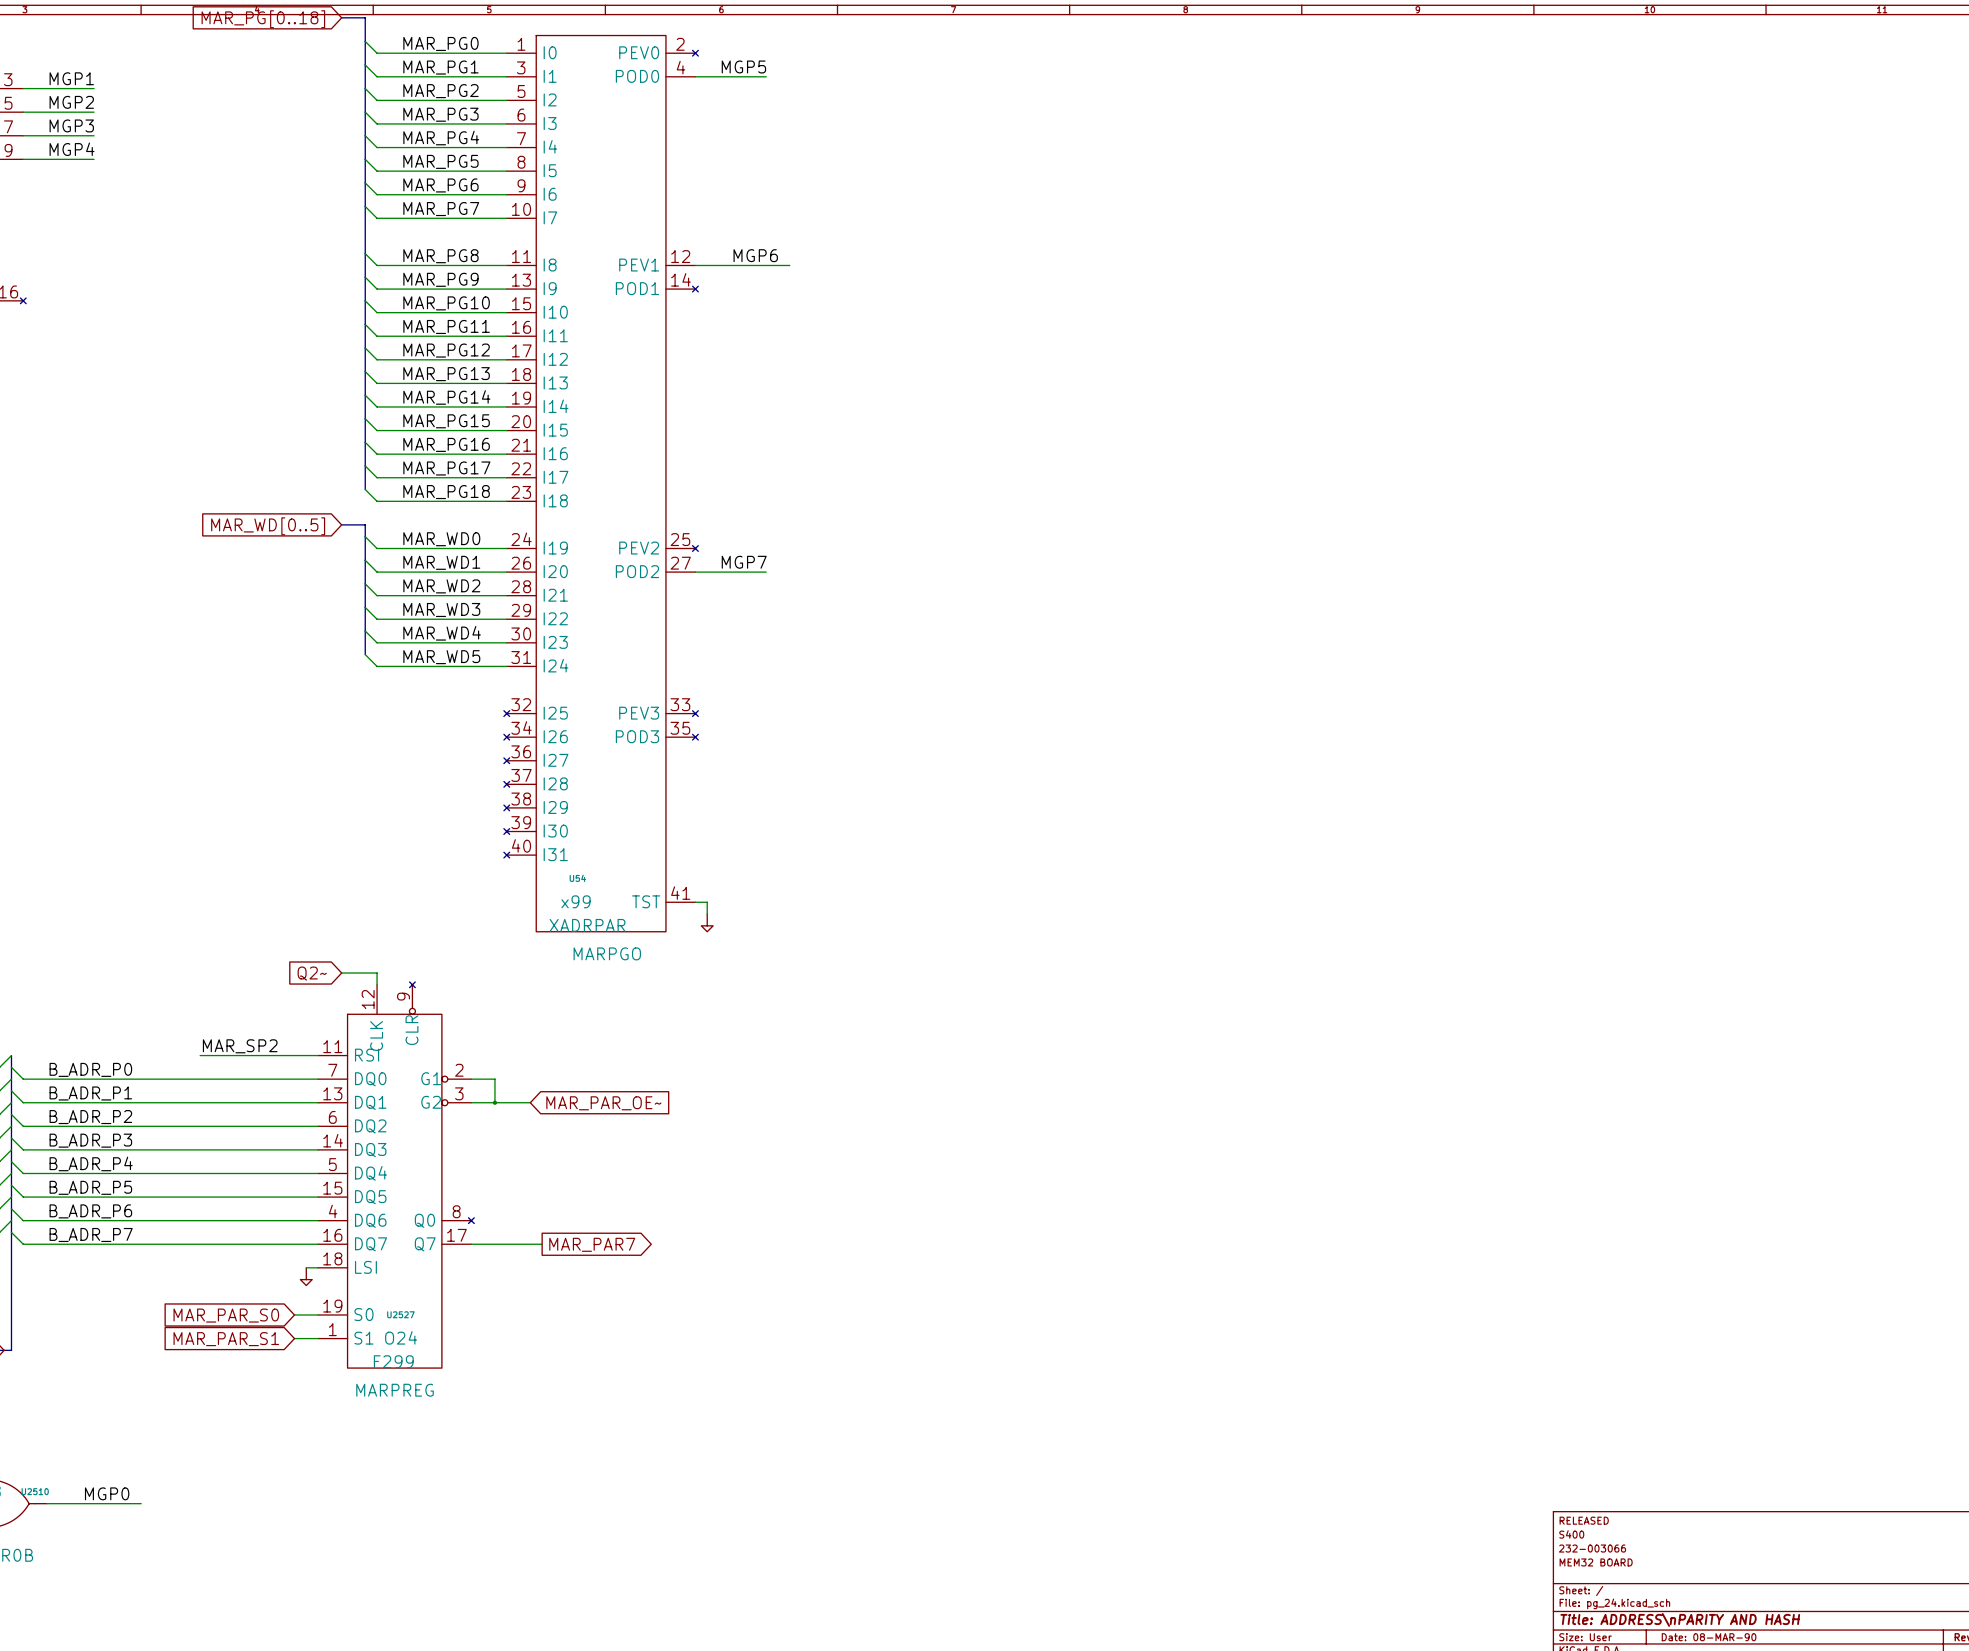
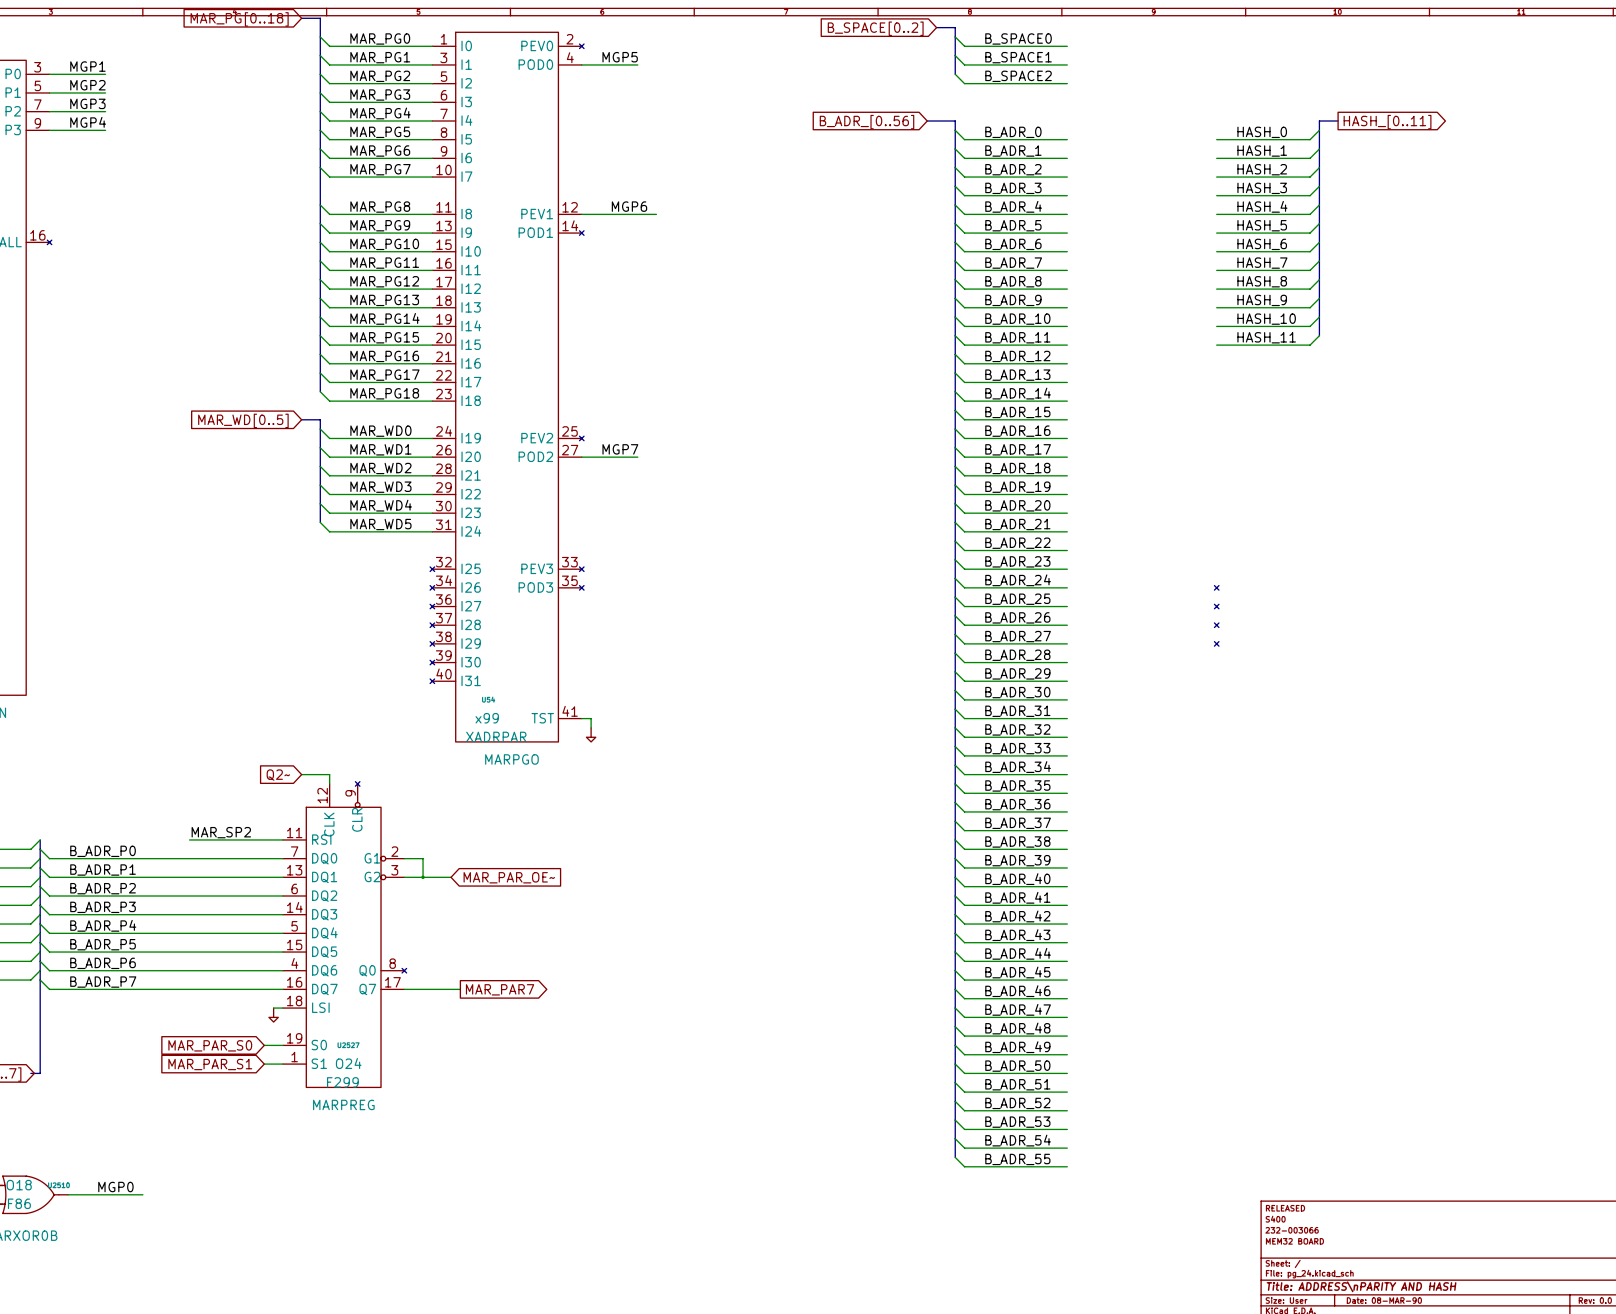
bus: none -> (936, 27) (955, 27) (955, 74)
global label: none -> B_SPACE[0..2] (875, 28)
wire: none -> (955, 36) (964, 46) (1067, 46)
label: none -> B_SPACE0 (1018, 38)
wire: none -> (955, 55) (964, 64) (1067, 64)
label: none -> B_SPACE1 (1018, 57)
wire: none -> (955, 74) (964, 83) (1067, 83)
label: none -> B_SPACE2 (1018, 76)
bus: none -> (927, 121) (955, 121) (955, 1157)
bus: none -> (1338, 121) (1319, 121) (1319, 335)
global label: none -> B_ADR_[0..56] (867, 122)
global label: none -> HASH_[0..11] (1387, 122)
wire: none -> (955, 130) (964, 139) (1067, 139)
wire: none -> (1319, 130) (1310, 139) (1216, 139)
label: none -> B_ADR_0 (1013, 132)
label: none -> HASH_0 (1262, 132)
wire: none -> (955, 149) (964, 158) (1067, 158)
wire: none -> (1319, 149) (1310, 158) (1216, 158)
label: none -> B_ADR_1 (1013, 151)
label: none -> HASH_1 (1262, 151)
wire: none -> (955, 167) (964, 177) (1067, 177)
wire: none -> (1319, 167) (1310, 177) (1216, 177)
label: none -> B_ADR_2 (1013, 169)
label: none -> HASH_2 (1262, 169)
wire: none -> (955, 186) (964, 195) (1067, 195)
wire: none -> (1319, 186) (1310, 195) (1216, 195)
label: none -> B_ADR_3 (1013, 188)
label: none -> HASH_3 (1262, 188)
wire: none -> (955, 205) (964, 214) (1067, 214)
wire: none -> (1319, 205) (1310, 214) (1216, 214)
label: none -> B_ADR_4 (1013, 206)
label: none -> HASH_4 (1262, 206)
wire: none -> (955, 223) (964, 233) (1067, 233)
wire: none -> (1319, 223) (1310, 233) (1216, 233)
label: none -> B_ADR_5 (1013, 225)
label: none -> HASH_5 (1262, 225)
wire: none -> (955, 242) (964, 251) (1067, 251)
wire: none -> (1319, 242) (1310, 251) (1216, 251)
label: none -> B_ADR_6 (1013, 244)
label: none -> HASH_6 (1262, 244)
wire: none -> (955, 261) (964, 270) (1067, 270)
wire: none -> (1319, 261) (1310, 270) (1216, 270)
label: none -> B_ADR_7 (1013, 263)
label: none -> HASH_7 (1262, 263)
wire: none -> (955, 279) (964, 289) (1067, 289)
wire: none -> (1319, 279) (1310, 289) (1216, 289)
label: none -> B_ADR_8 (1013, 281)
label: none -> HASH_8 (1262, 281)
wire: none -> (955, 298) (964, 307) (1067, 307)
wire: none -> (1319, 298) (1310, 307) (1216, 307)
label: none -> B_ADR_9 (1013, 300)
label: none -> HASH_9 (1262, 300)
wire: none -> (955, 317) (964, 326) (1067, 326)
wire: none -> (1319, 317) (1310, 326) (1216, 326)
label: none -> B_ADR_10 (1017, 319)
label: none -> HASH_10 (1266, 319)
wire: none -> (955, 335) (964, 345) (1067, 345)
wire: none -> (1319, 335) (1310, 345) (1216, 345)
label: none -> B_ADR_11 (1017, 337)
label: none -> HASH_11 (1266, 337)
wire: none -> (955, 354) (964, 363) (1067, 363)
label: none -> B_ADR_12 (1017, 356)
wire: none -> (955, 373) (964, 382) (1067, 382)
label: none -> B_ADR_13 (1017, 375)
wire: none -> (955, 391) (964, 401) (1067, 401)
label: none -> B_ADR_14 (1018, 393)
wire: none -> (955, 410) (964, 419) (1067, 419)
label: none -> B_ADR_15 (1017, 412)
wire: none -> (955, 429) (964, 438) (1067, 438)
label: none -> B_ADR_16 (1017, 431)
wire: none -> (955, 447) (964, 457) (1067, 457)
label: none -> B_ADR_17 (1018, 449)
wire: none -> (955, 466) (964, 475) (1067, 475)
label: none -> B_ADR_18 (1017, 468)
wire: none -> (955, 485) (964, 494) (1067, 494)
label: none -> B_ADR_19 (1017, 487)
wire: none -> (955, 503) (964, 513) (1067, 513)
label: none -> B_ADR_20 (1017, 505)
wire: none -> (955, 522) (964, 531) (1067, 531)
label: none -> B_ADR_21 (1017, 524)
wire: none -> (955, 541) (964, 550) (1067, 550)
label: none -> B_ADR_22 (1017, 543)
wire: none -> (955, 559) (964, 569) (1067, 569)
label: none -> B_ADR_23 (1017, 561)
wire: none -> (955, 578) (964, 587) (1067, 587)
label: none -> B_ADR_24 (1018, 580)
no-connect mark: none -> (1216, 587)
wire: none -> (955, 597) (964, 606) (1067, 606)
label: none -> B_ADR_25 (1017, 599)
no-connect mark: none -> (1216, 606)
wire: none -> (955, 615) (964, 625) (1067, 625)
label: none -> B_ADR_26 (1017, 617)
no-connect mark: none -> (1216, 625)
wire: none -> (955, 634) (964, 643) (1067, 643)
label: none -> B_ADR_27 (1018, 636)
no-connect mark: none -> (1216, 643)
wire: none -> (955, 653) (964, 662) (1067, 662)
label: none -> B_ADR_28 (1017, 655)
wire: none -> (955, 671) (964, 681) (1067, 681)
label: none -> B_ADR_29 (1017, 673)
wire: none -> (955, 690) (964, 699) (1067, 699)
label: none -> B_ADR_30 (1017, 692)
wire: none -> (955, 709) (964, 718) (1067, 718)
label: none -> B_ADR_31 (1017, 711)
wire: none -> (955, 727) (964, 737) (1067, 737)
label: none -> B_ADR_32 (1017, 729)
wire: none -> (955, 746) (964, 755) (1067, 755)
label: none -> B_ADR_33 (1017, 748)
wire: none -> (955, 765) (964, 774) (1067, 774)
label: none -> B_ADR_34 (1018, 767)
wire: none -> (955, 783) (964, 793) (1067, 793)
label: none -> B_ADR_35 (1017, 785)
wire: none -> (955, 802) (964, 811) (1067, 811)
label: none -> B_ADR_36 (1017, 804)
wire: none -> (955, 821) (964, 830) (1067, 830)
label: none -> B_ADR_37 (1018, 823)
wire: none -> (955, 839) (964, 849) (1067, 849)
label: none -> B_ADR_38 (1017, 841)
wire: none -> (955, 858) (964, 867) (1067, 867)
label: none -> B_ADR_39 (1017, 860)
wire: none -> (955, 877) (964, 886) (1067, 886)
label: none -> B_ADR_40 (1017, 879)
wire: none -> (955, 896) (964, 905) (1067, 905)
label: none -> B_ADR_41 (1017, 897)
wire: none -> (955, 914) (964, 924) (1067, 924)
label: none -> B_ADR_42 (1017, 916)
wire: none -> (955, 933) (964, 942) (1067, 942)
label: none -> B_ADR_43 (1017, 935)
wire: none -> (955, 952) (964, 961) (1067, 961)
label: none -> B_ADR_44 (1018, 953)
wire: none -> (955, 970) (964, 980) (1067, 980)
label: none -> B_ADR_45 (1017, 972)
wire: none -> (955, 989) (964, 998) (1067, 998)
label: none -> B_ADR_46 (1017, 991)
wire: none -> (955, 1008) (964, 1017) (1067, 1017)
label: none -> B_ADR_47 (1018, 1009)
wire: none -> (955, 1026) (964, 1036) (1067, 1036)
label: none -> B_ADR_48 (1017, 1028)
wire: none -> (955, 1045) (964, 1054) (1067, 1054)
label: none -> B_ADR_49 (1017, 1047)
wire: none -> (955, 1064) (964, 1073) (1067, 1073)
label: none -> B_ADR_50 (1017, 1066)
wire: none -> (955, 1082) (964, 1092) (1067, 1092)
label: none -> B_ADR_51 (1017, 1084)
wire: none -> (955, 1101) (964, 1110) (1067, 1110)
label: none -> B_ADR_52 (1017, 1103)
wire: none -> (955, 1120) (964, 1129) (1067, 1129)
label: none -> B_ADR_53 (1017, 1122)
wire: none -> (955, 1138) (964, 1148) (1067, 1148)
label: none -> B_ADR_54 (1018, 1140)
wire: none -> (955, 1157) (964, 1166) (1067, 1166)
label: none -> B_ADR_55 (1017, 1159)

